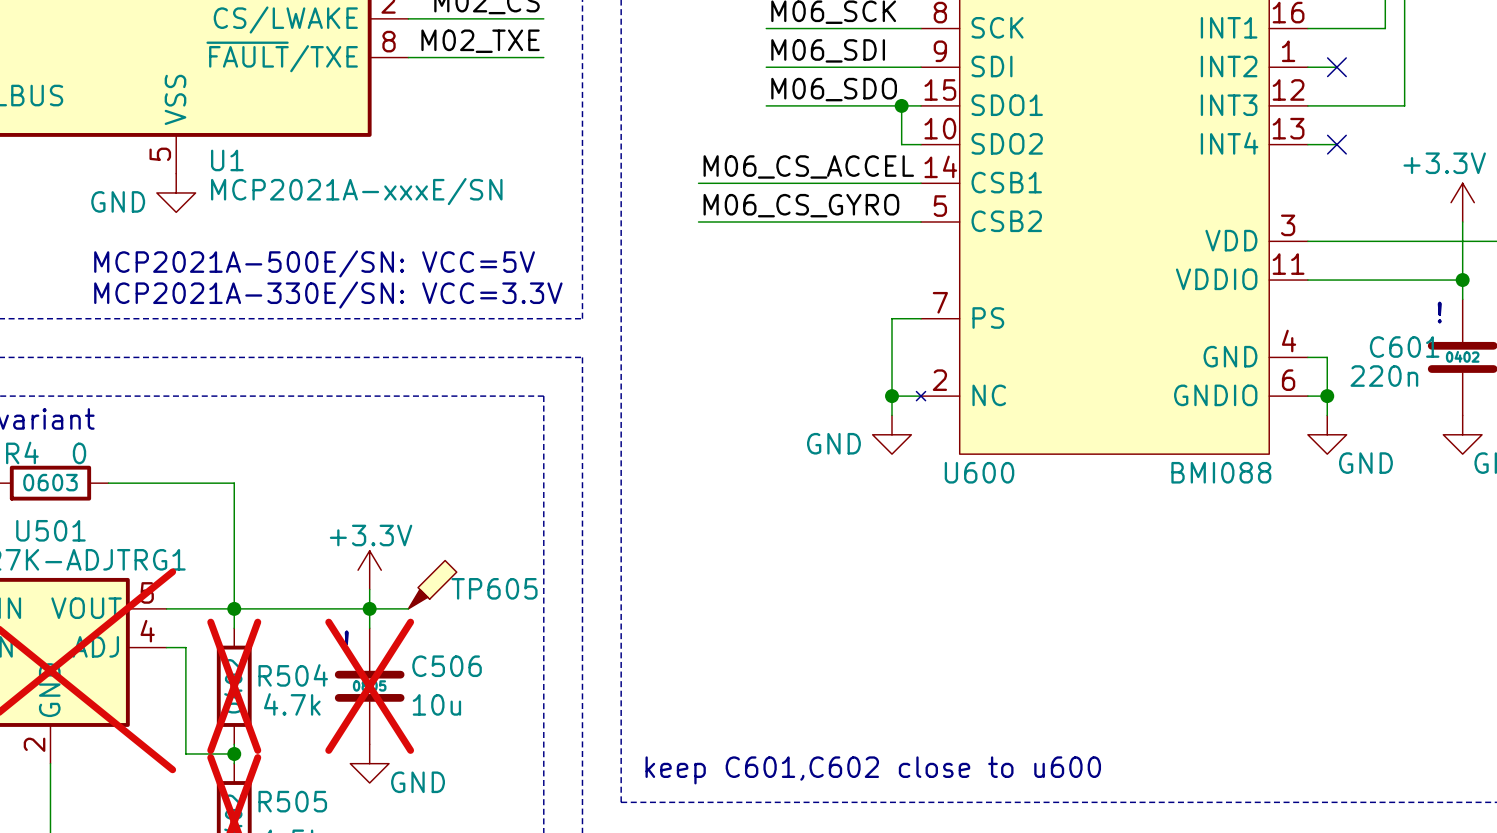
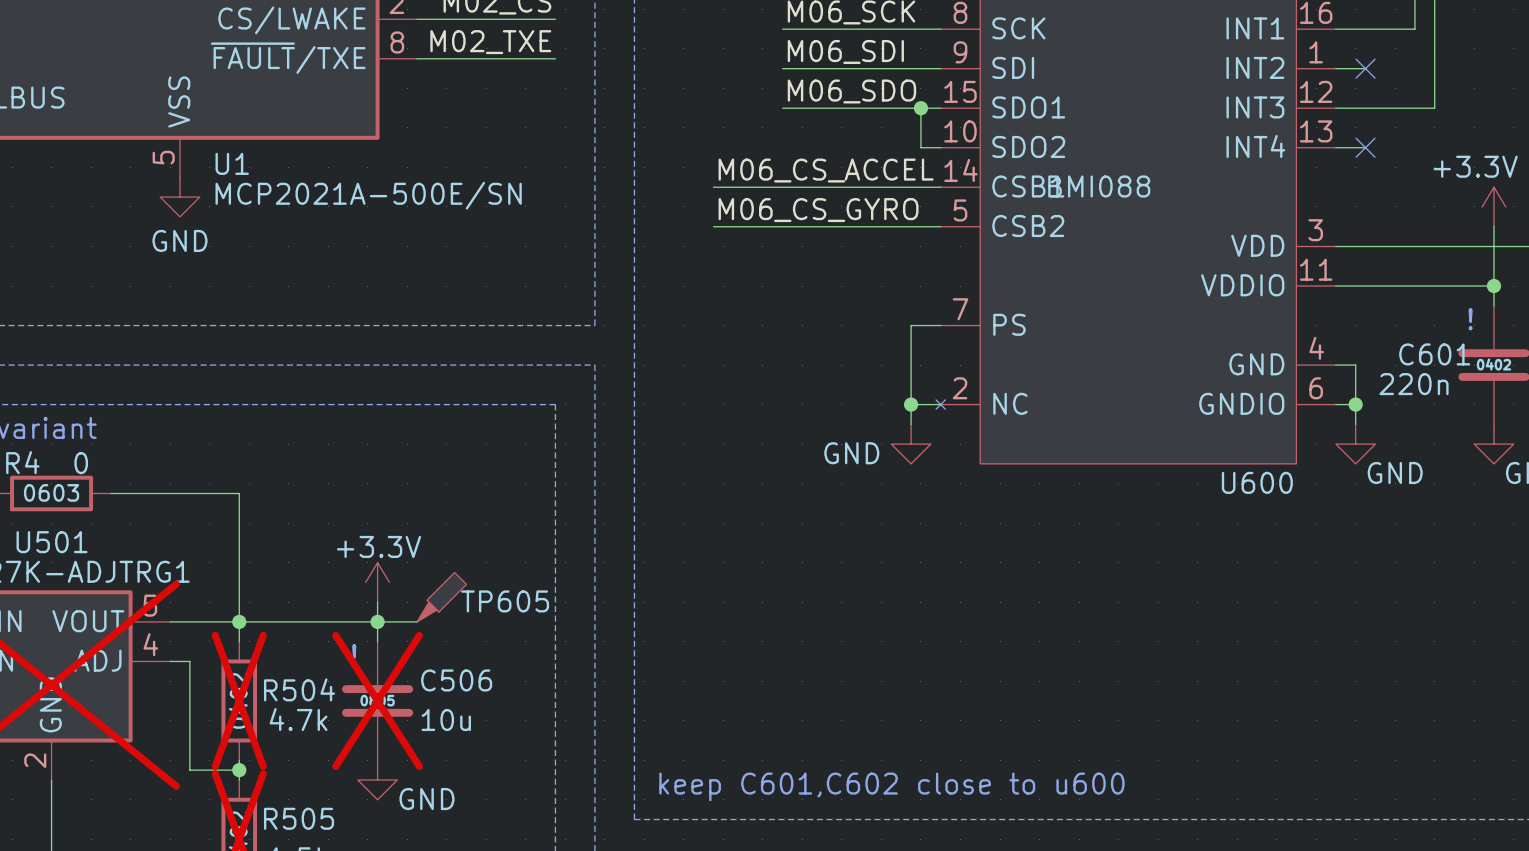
U1 value: MCP2021A-xxxE/SN (356, 191) -> MCP2021A-500E/SN (368, 195)
power symbol text position: GND (118, 201) -> GND (179, 240)
text: MCP2021A-500E/SN: VCC=5V (314, 263) -> none
text: MCP2021A-330E/SN: VCC=3.3V (328, 295) -> none
U600 name position: U600 (979, 472) -> U600 (1257, 482)
U600 value position: BMI088 (1221, 472) -> BMI088 (1099, 186)
R4 text: none -> 0603 (51, 492)
R4 text: 0603 (50, 482) -> none

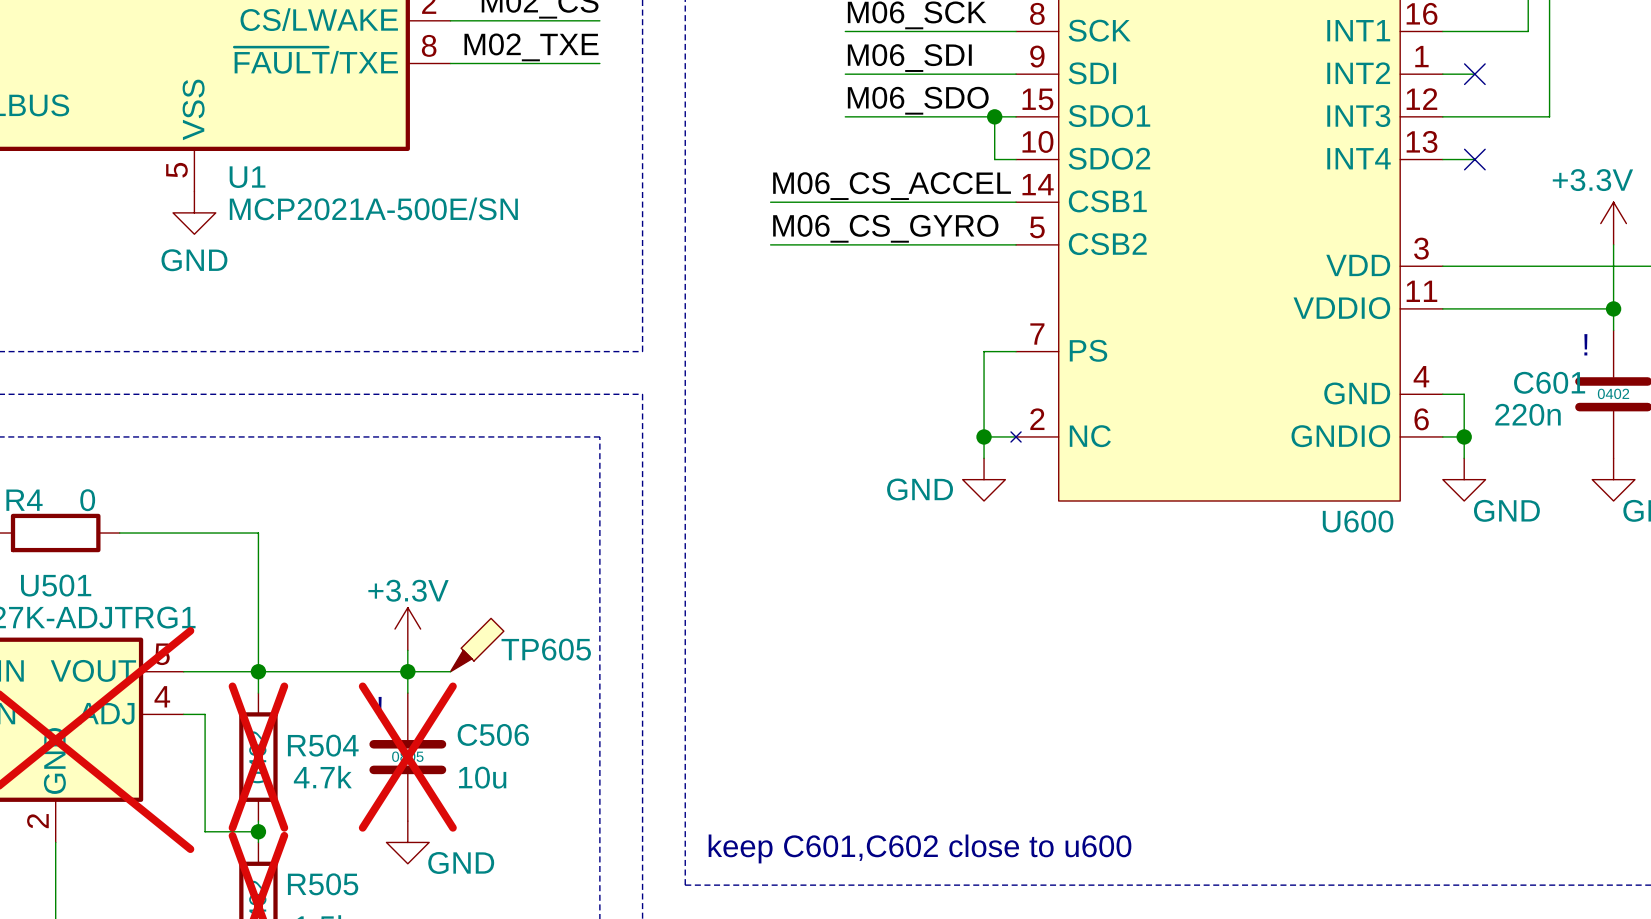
U600 value: BMI088 (1099, 186) -> none
R4 text: 0603 (51, 492) -> none

